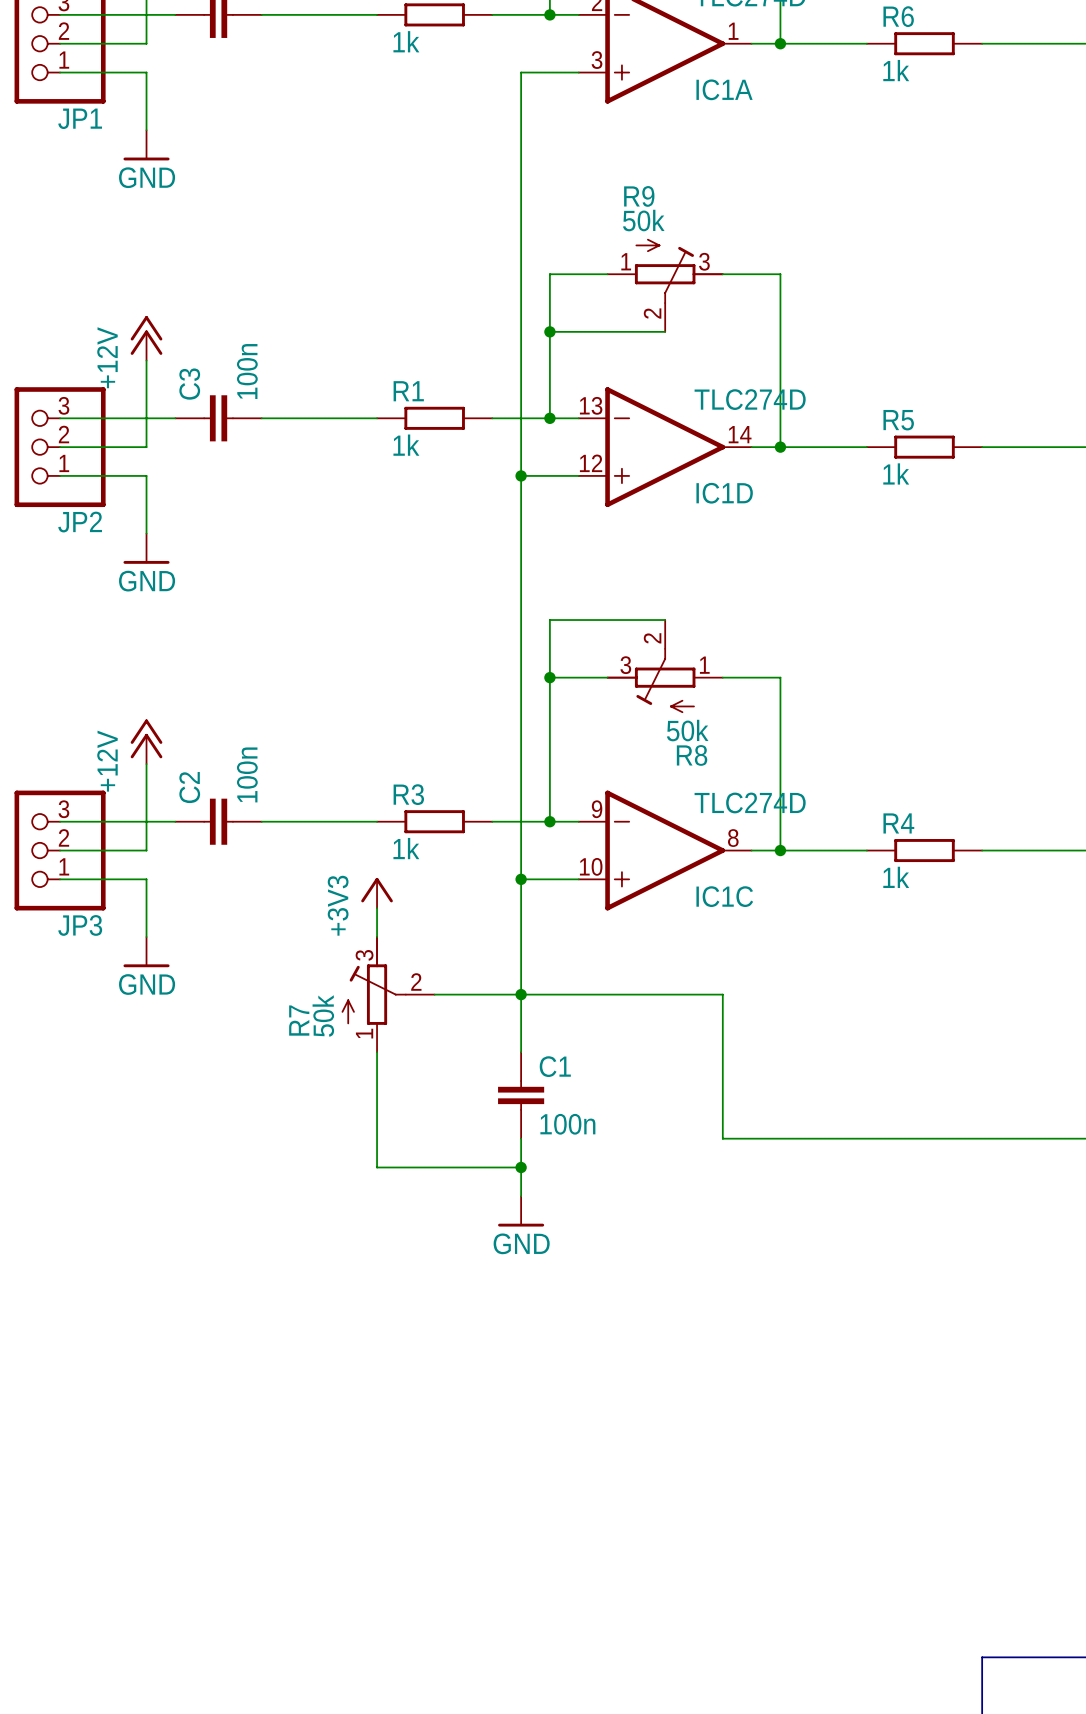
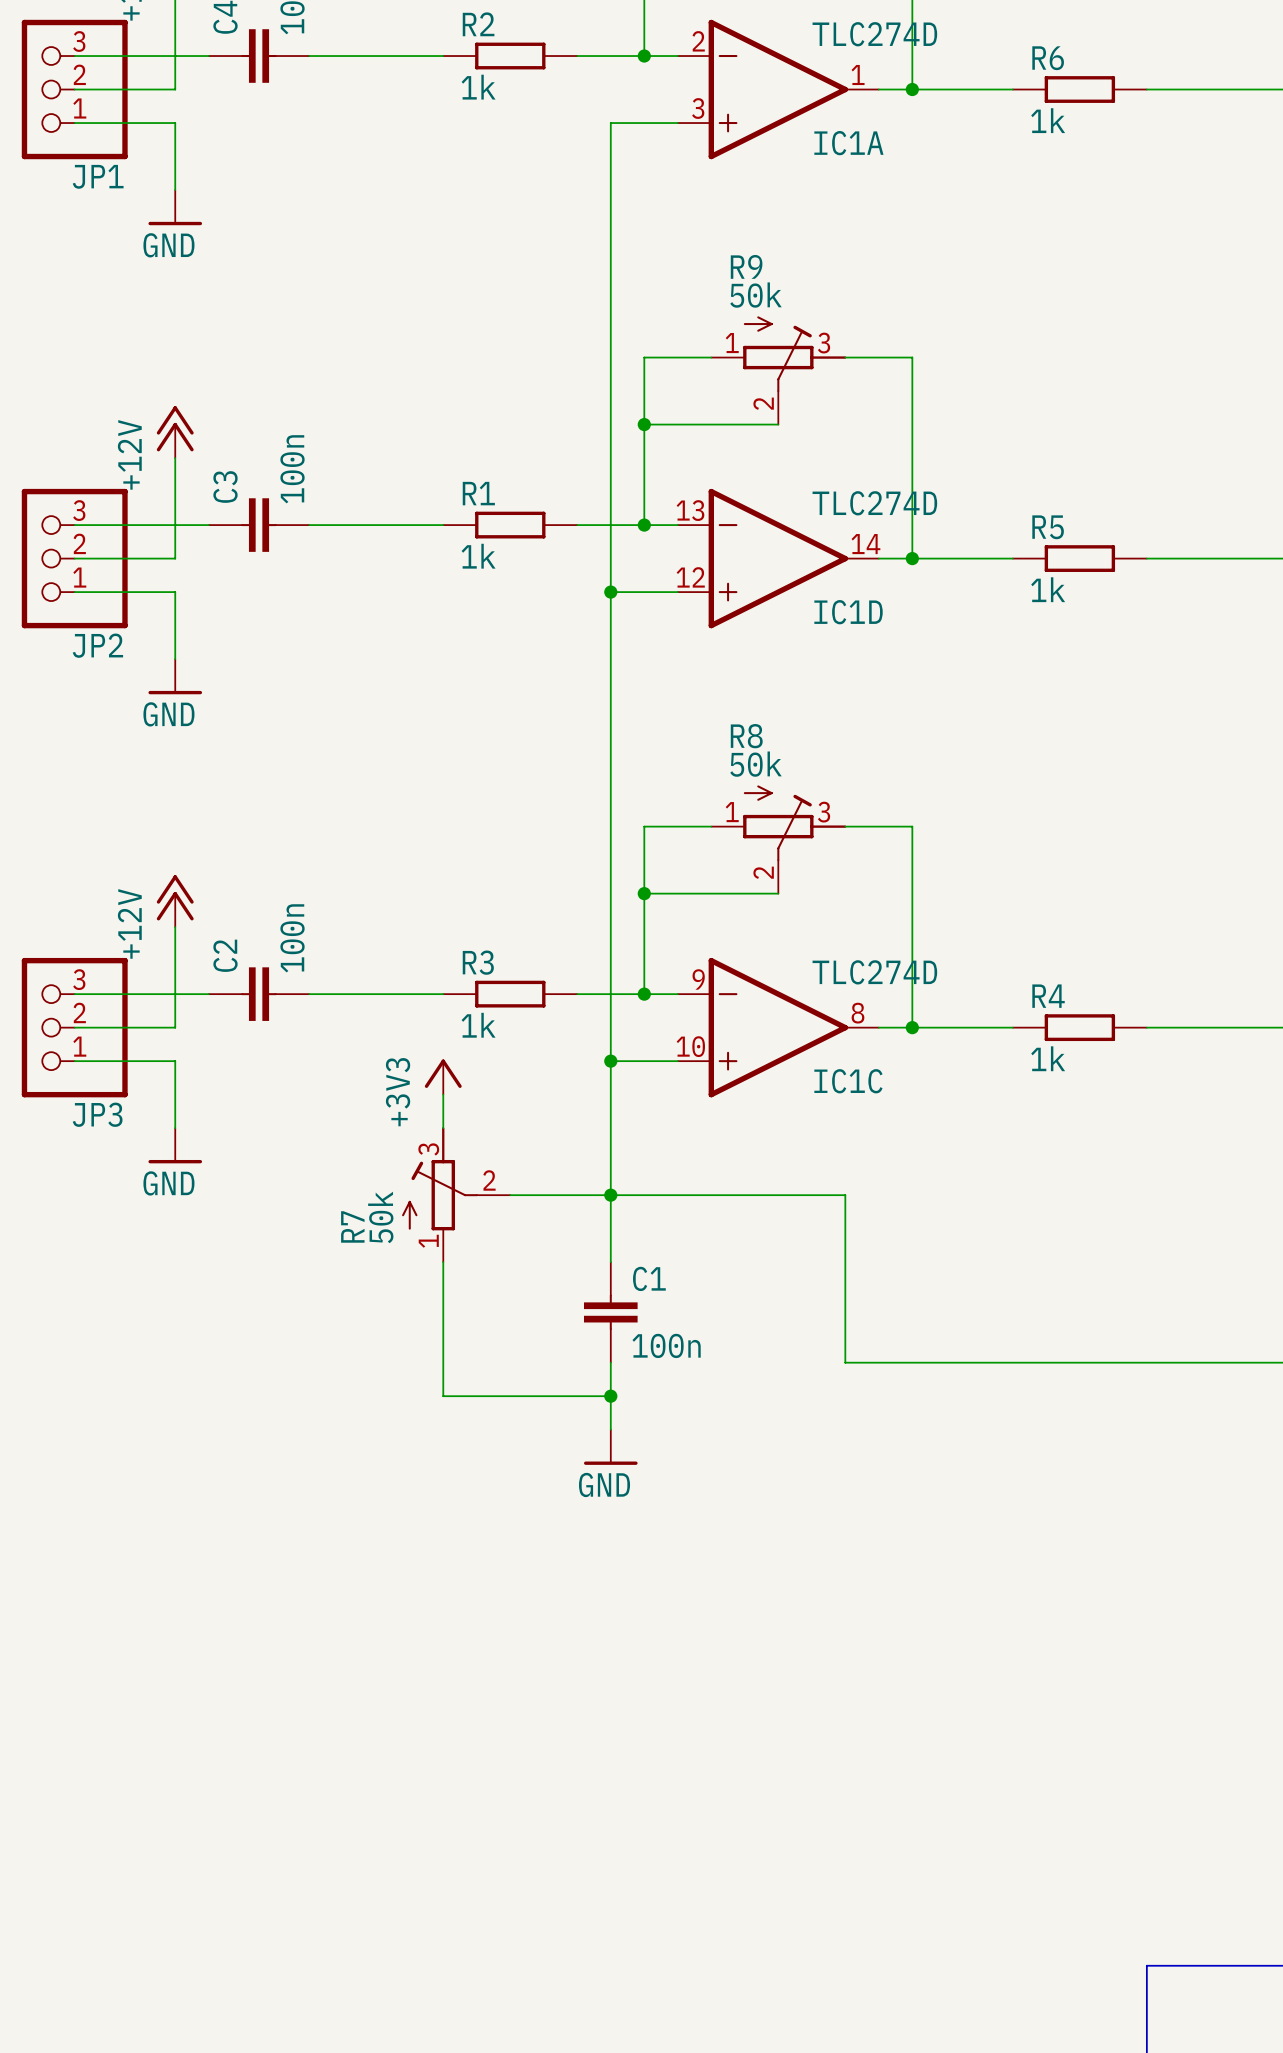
wire: (665, 620) (549, 620) (549, 677) -> none
junction position: (549, 677) -> (644, 893)
R8 rotation: 0° (651, 680) -> 180° (794, 823)
wire: none -> (644, 893) (778, 893)

